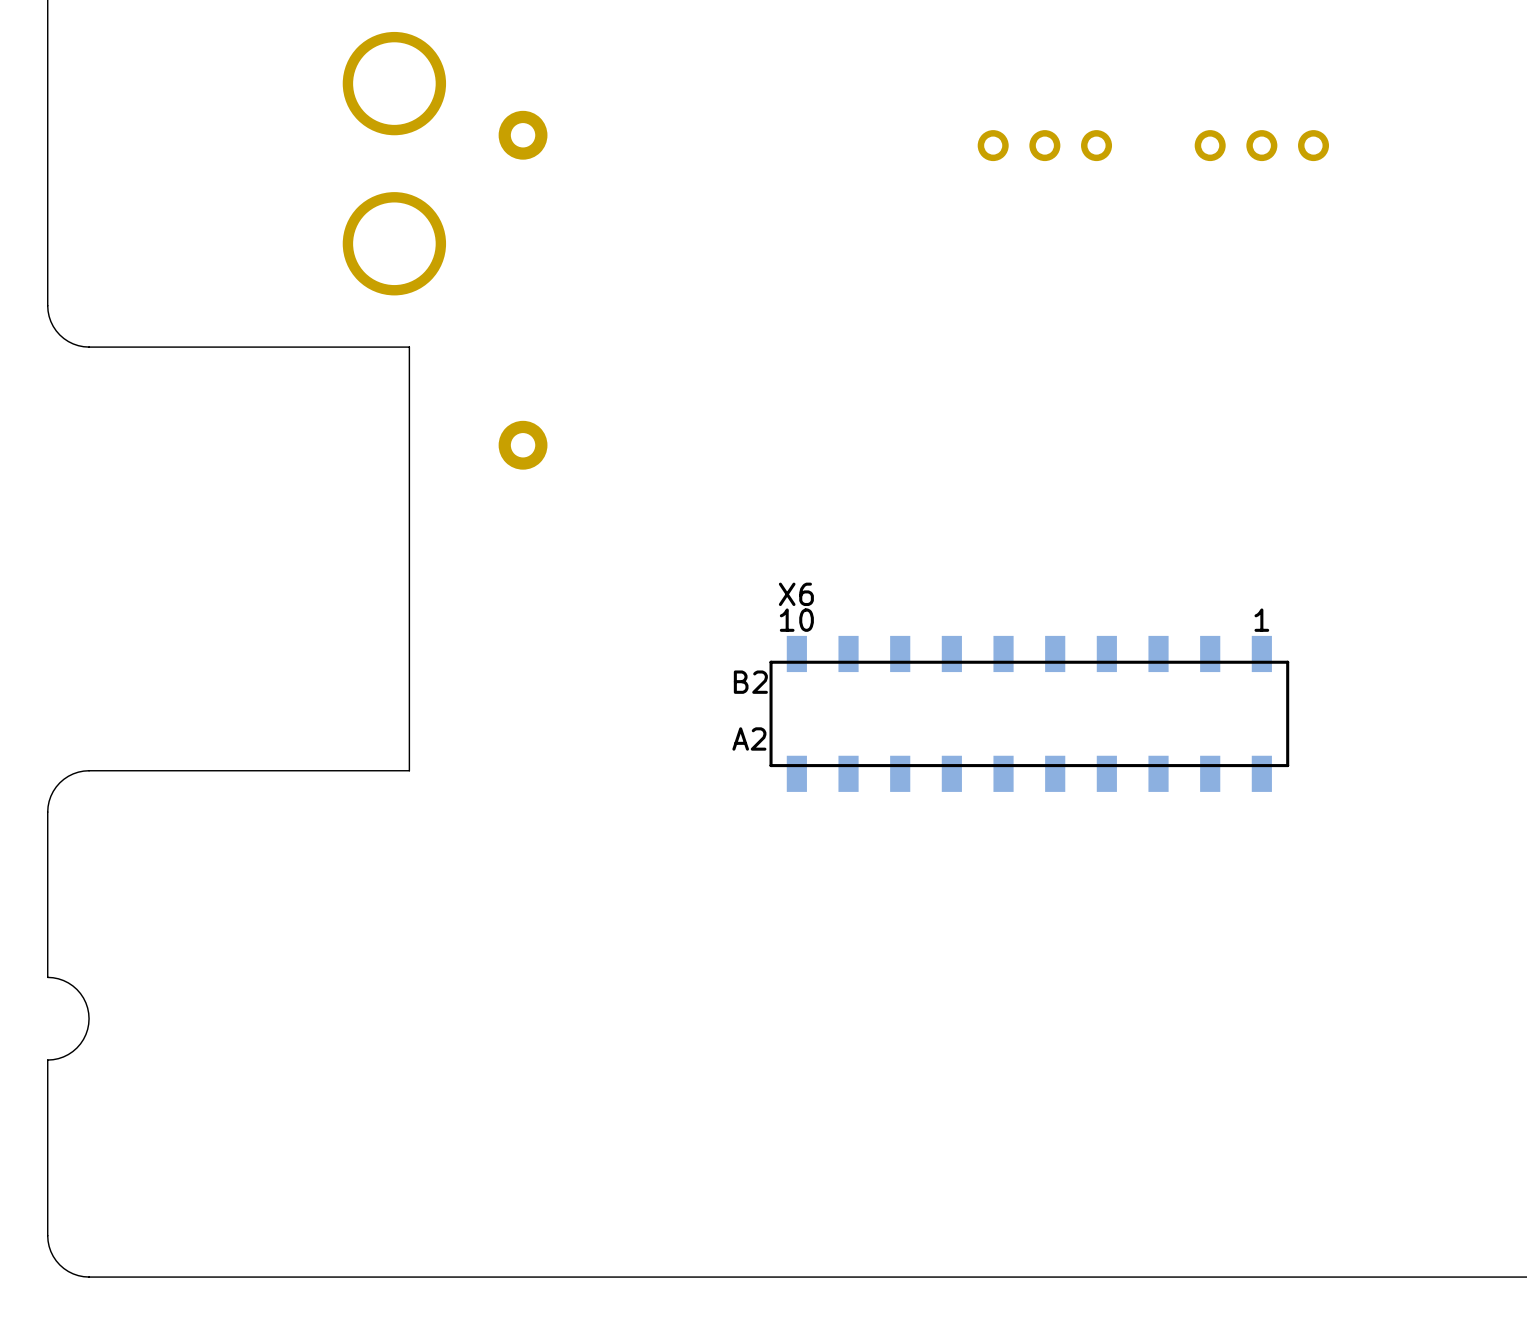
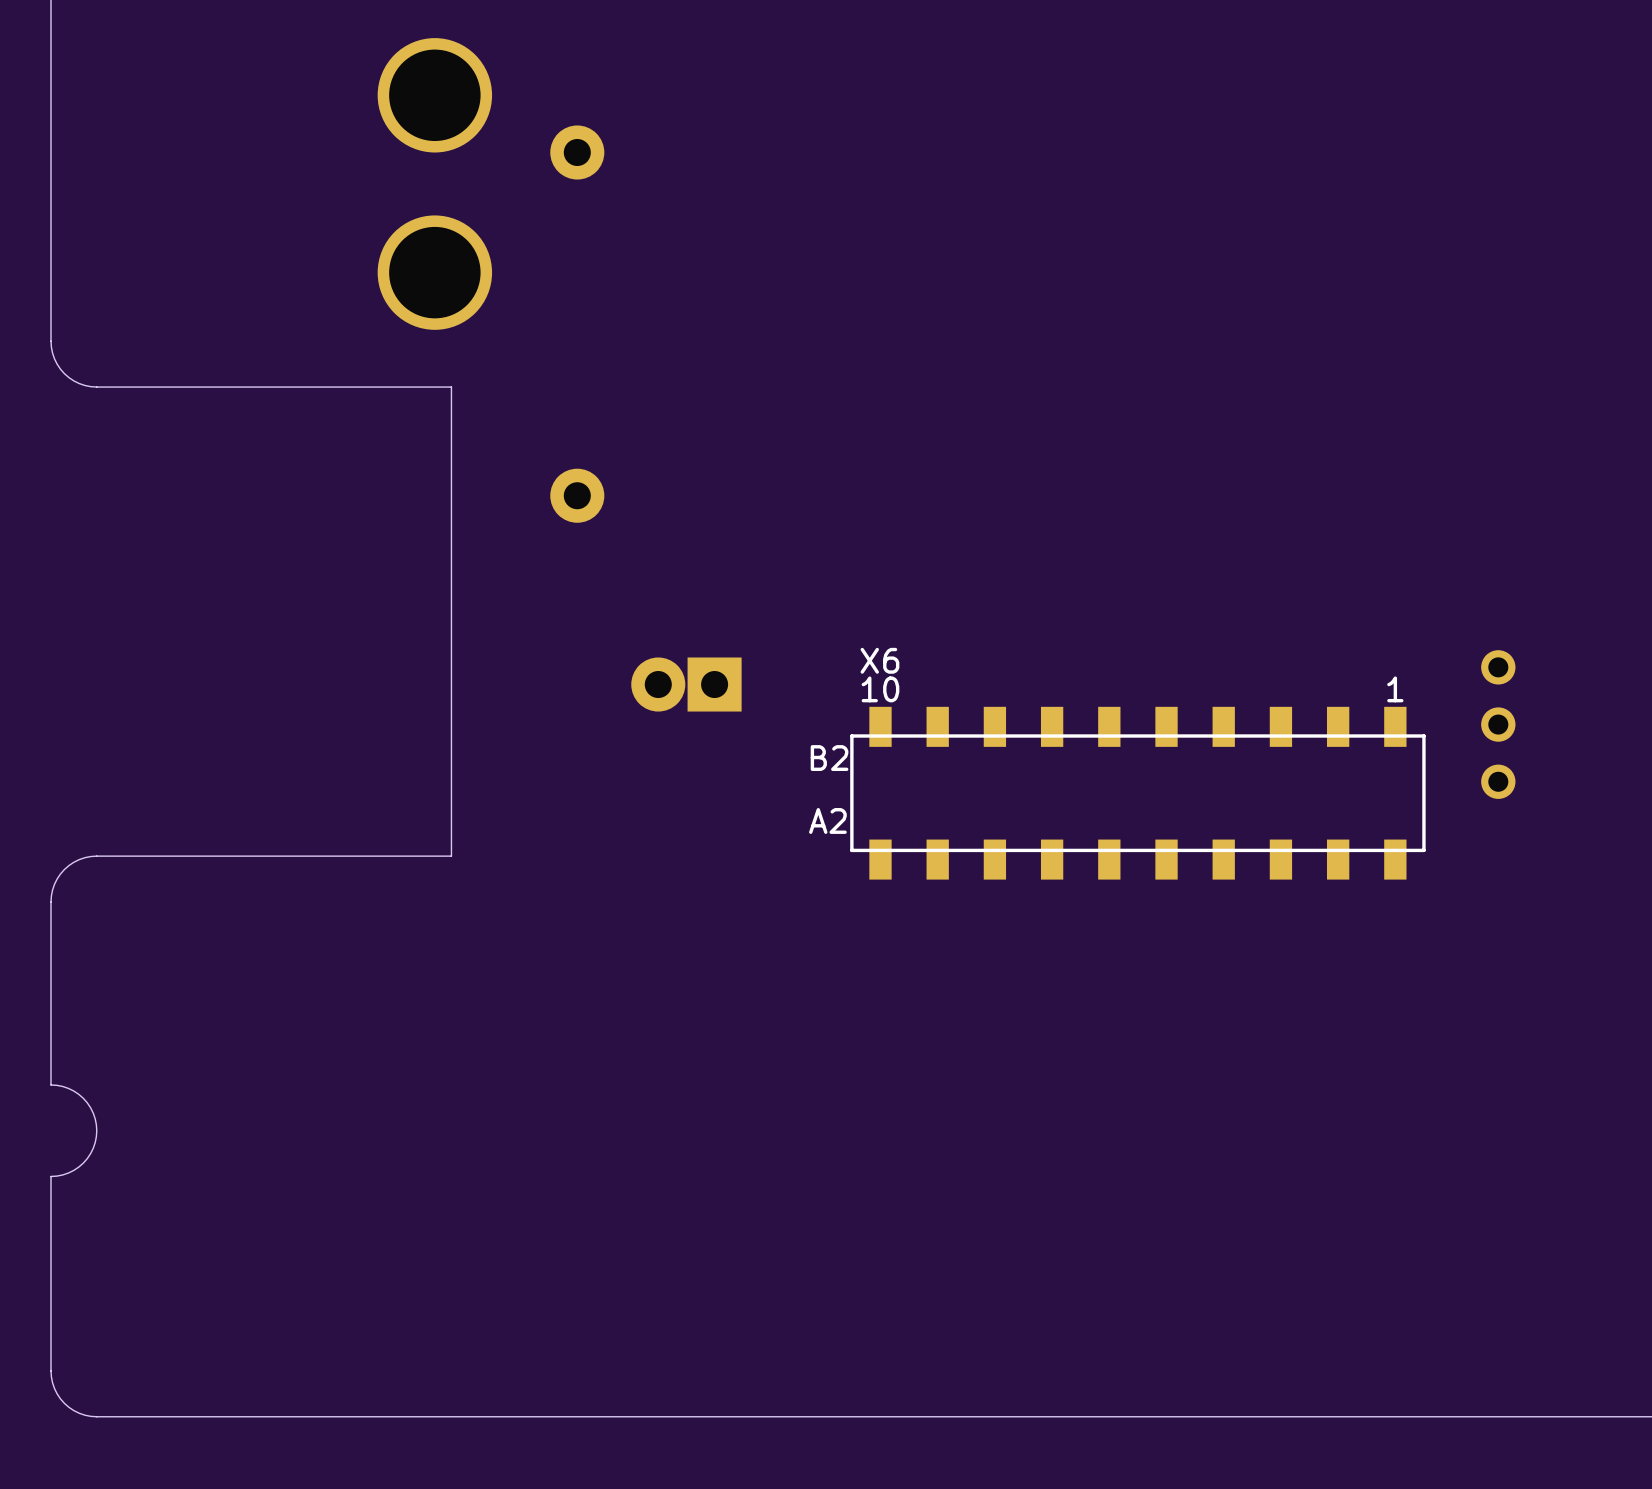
part: (1044, 145) -> none
part: (1261, 145) -> none
part: none -> (686, 684)
part: none -> (1498, 724)

